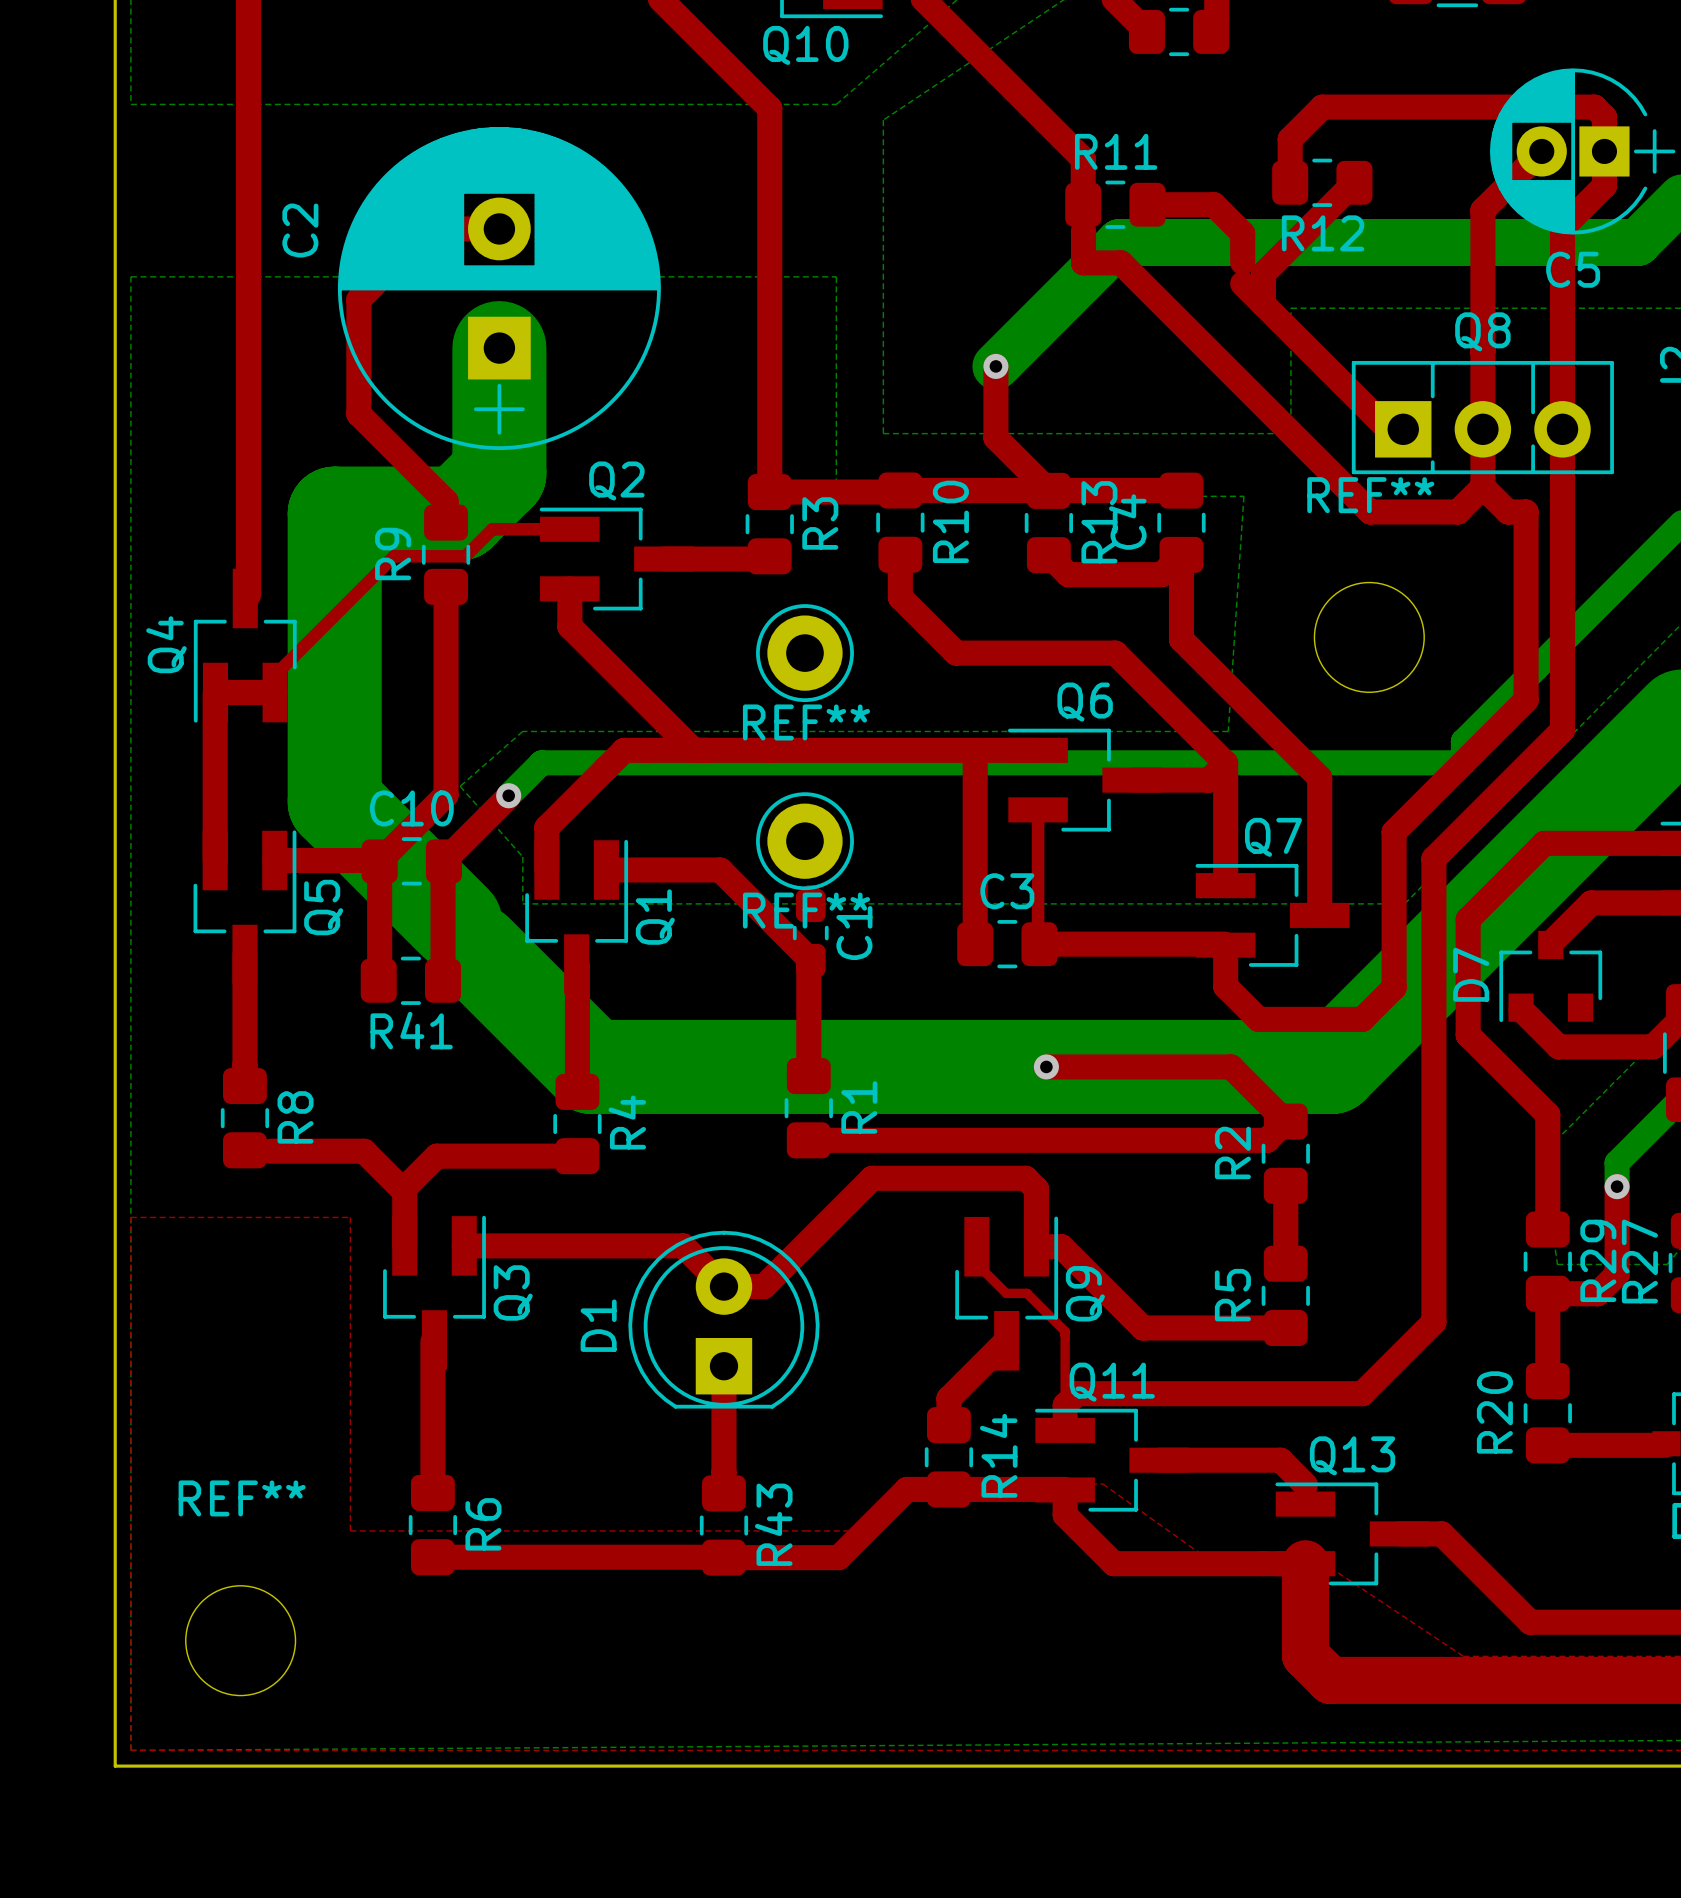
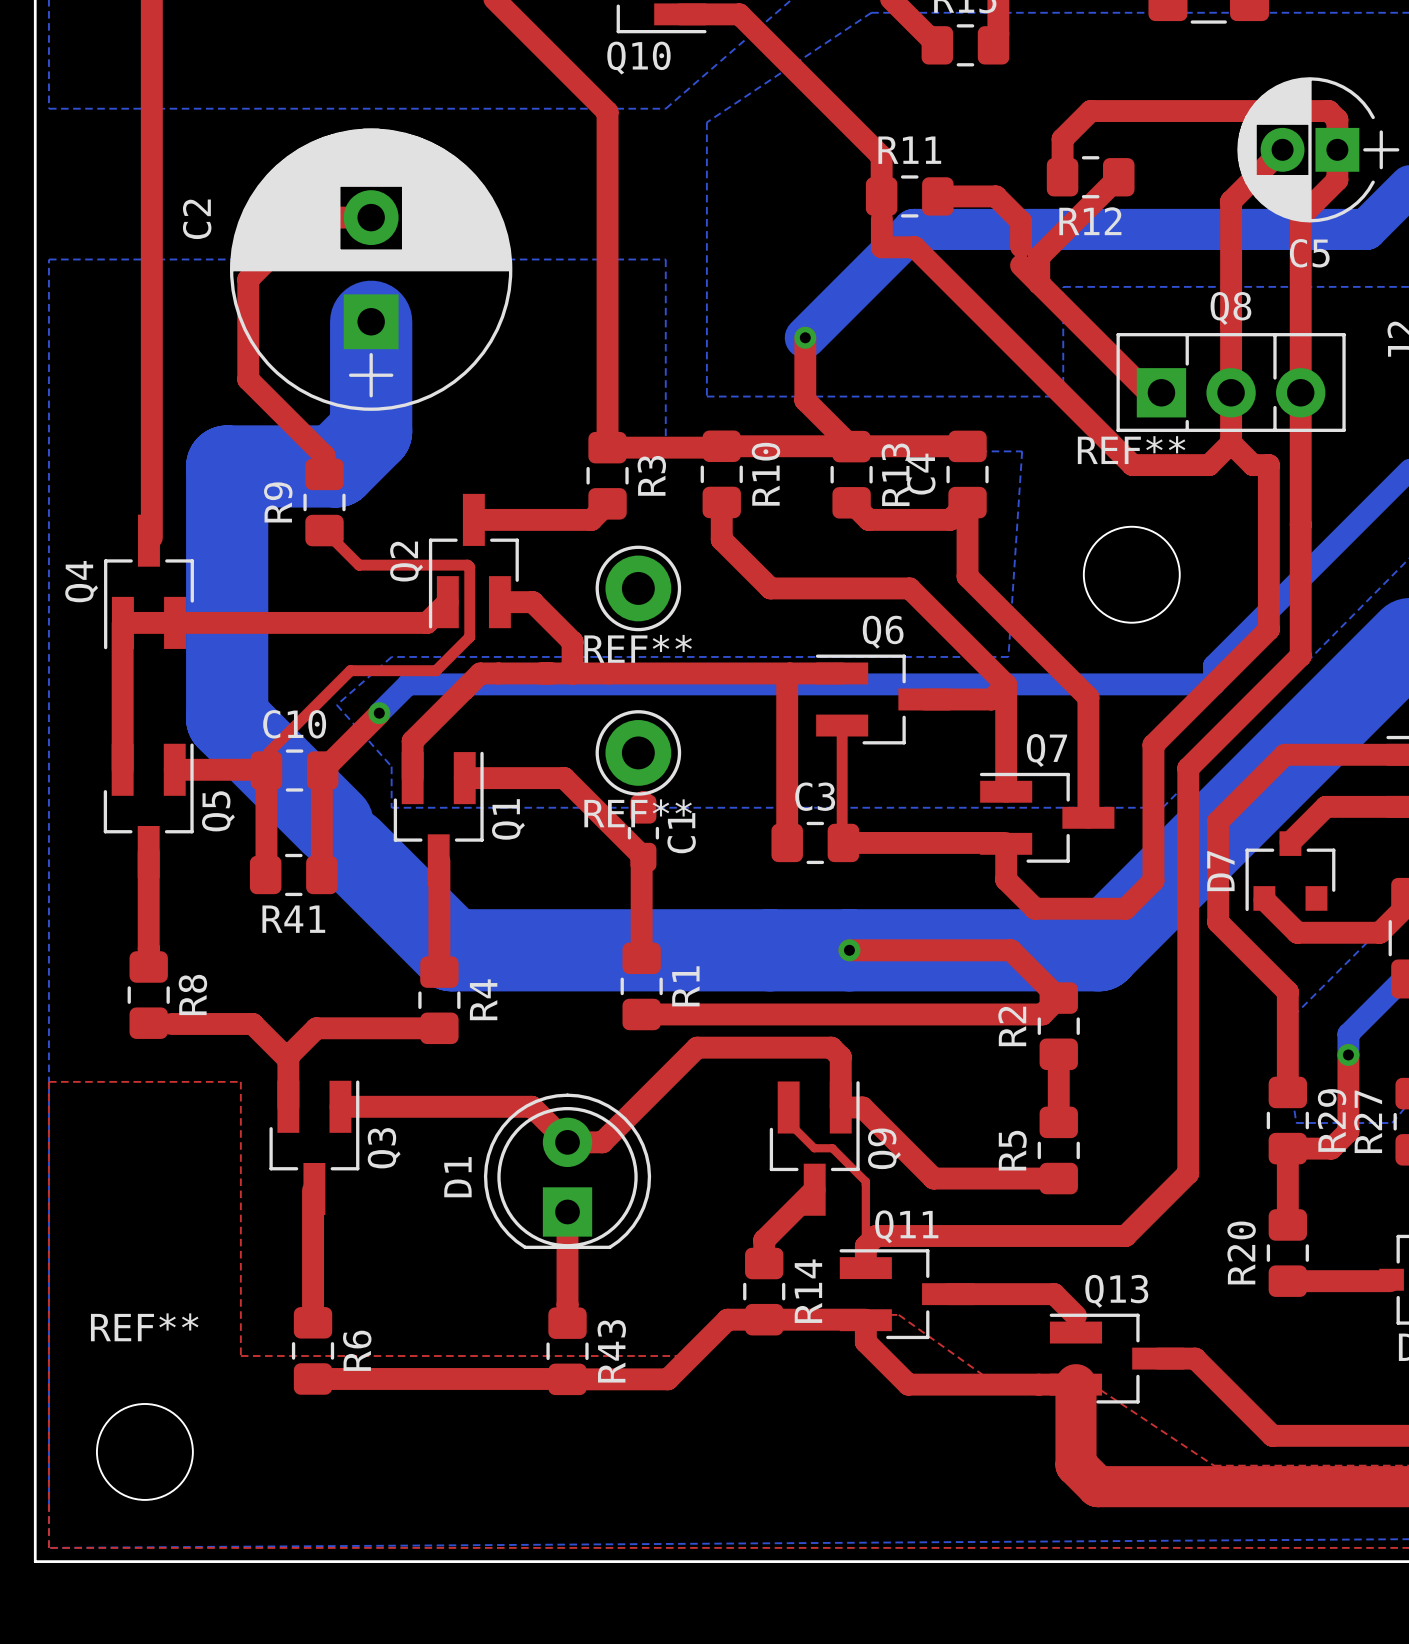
top track: (569, 529) (492, 529) (465, 556) (394, 556) (275, 675) -> none
Q2 rotation: 0° (616, 559) -> 90° counterclockwise (473, 561)
top track: (663, 559) (767, 559) -> (473, 519) (591, 519) (605, 506)
top track: (446, 586) (446, 794) (379, 861) -> (324, 530) (359, 565) (467, 565) (469, 567) (469, 636) (436, 670) (350, 670) (268, 752)
top track: (569, 588) (569, 626) (693, 750) -> none
top track: none -> (447, 602) (427, 622) (175, 622)
top track: none -> (499, 602) (532, 602) (572, 641) (572, 673)

